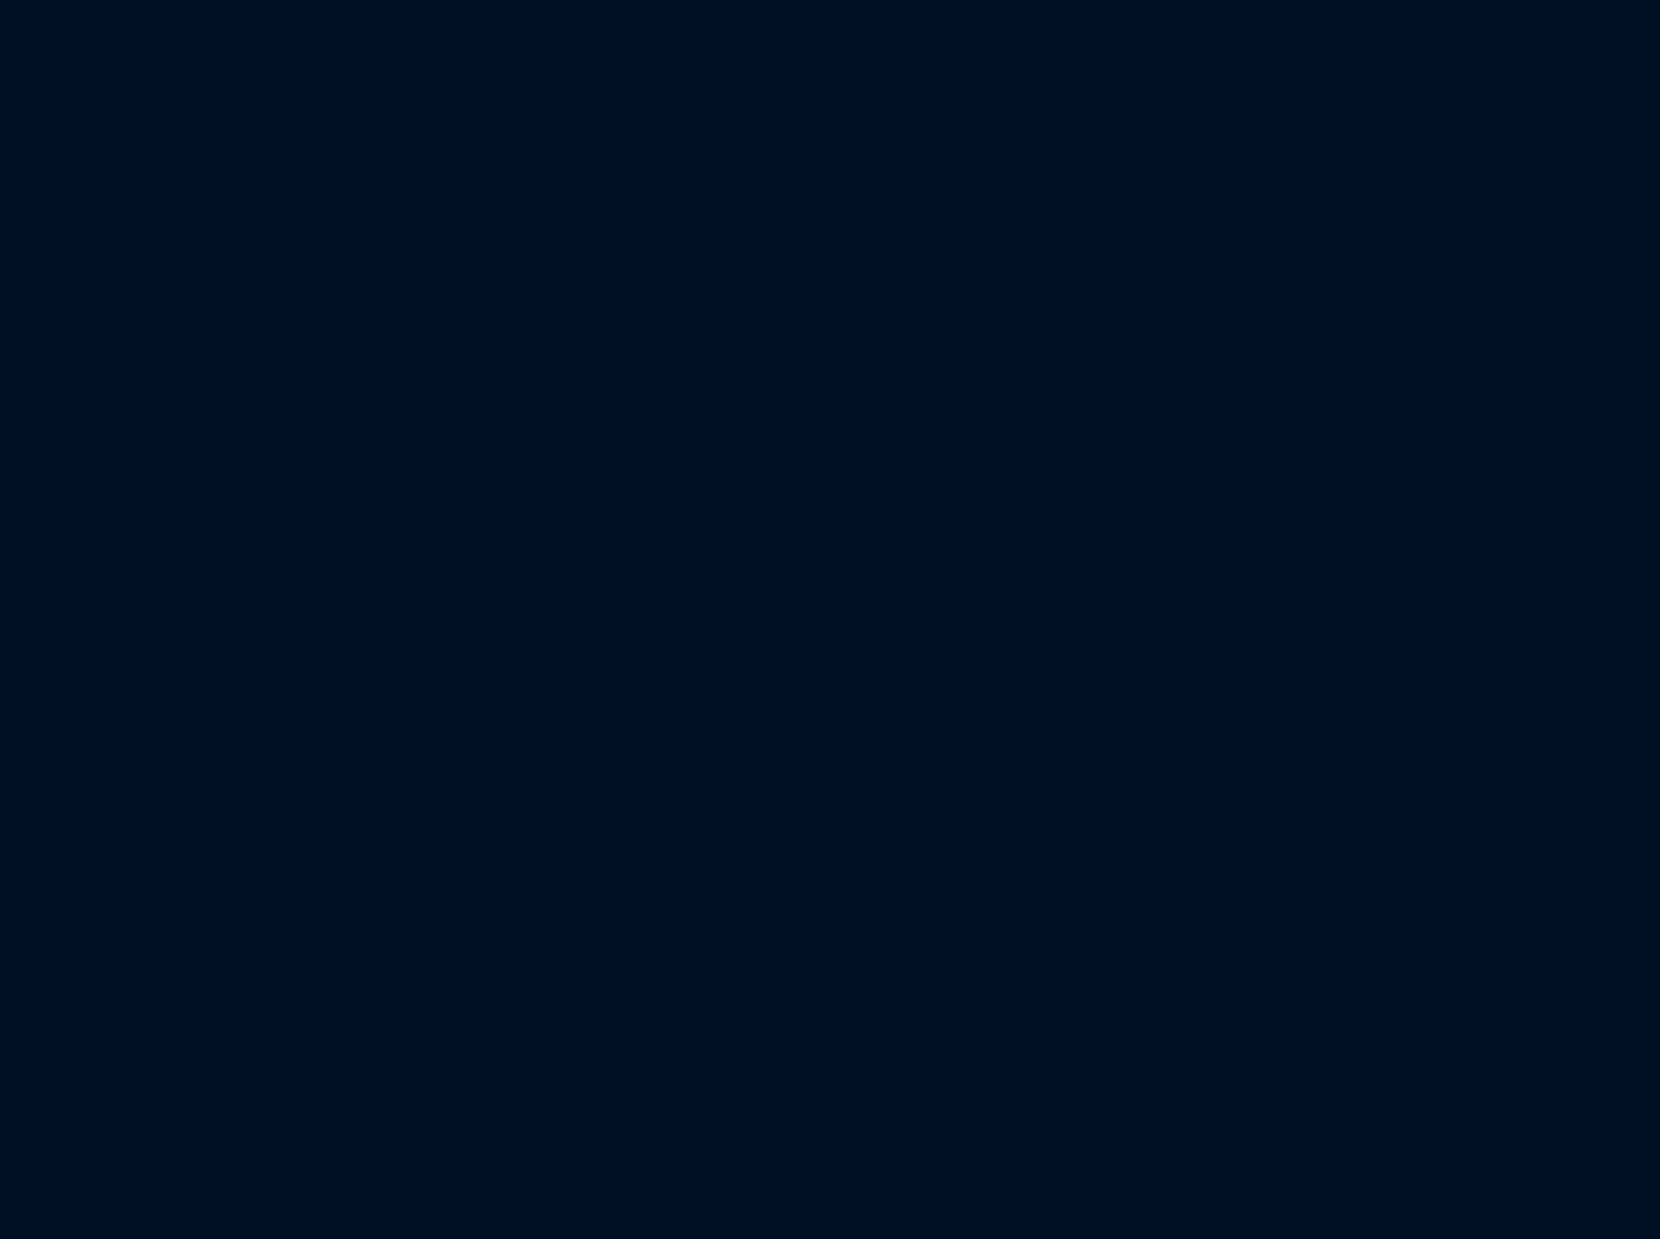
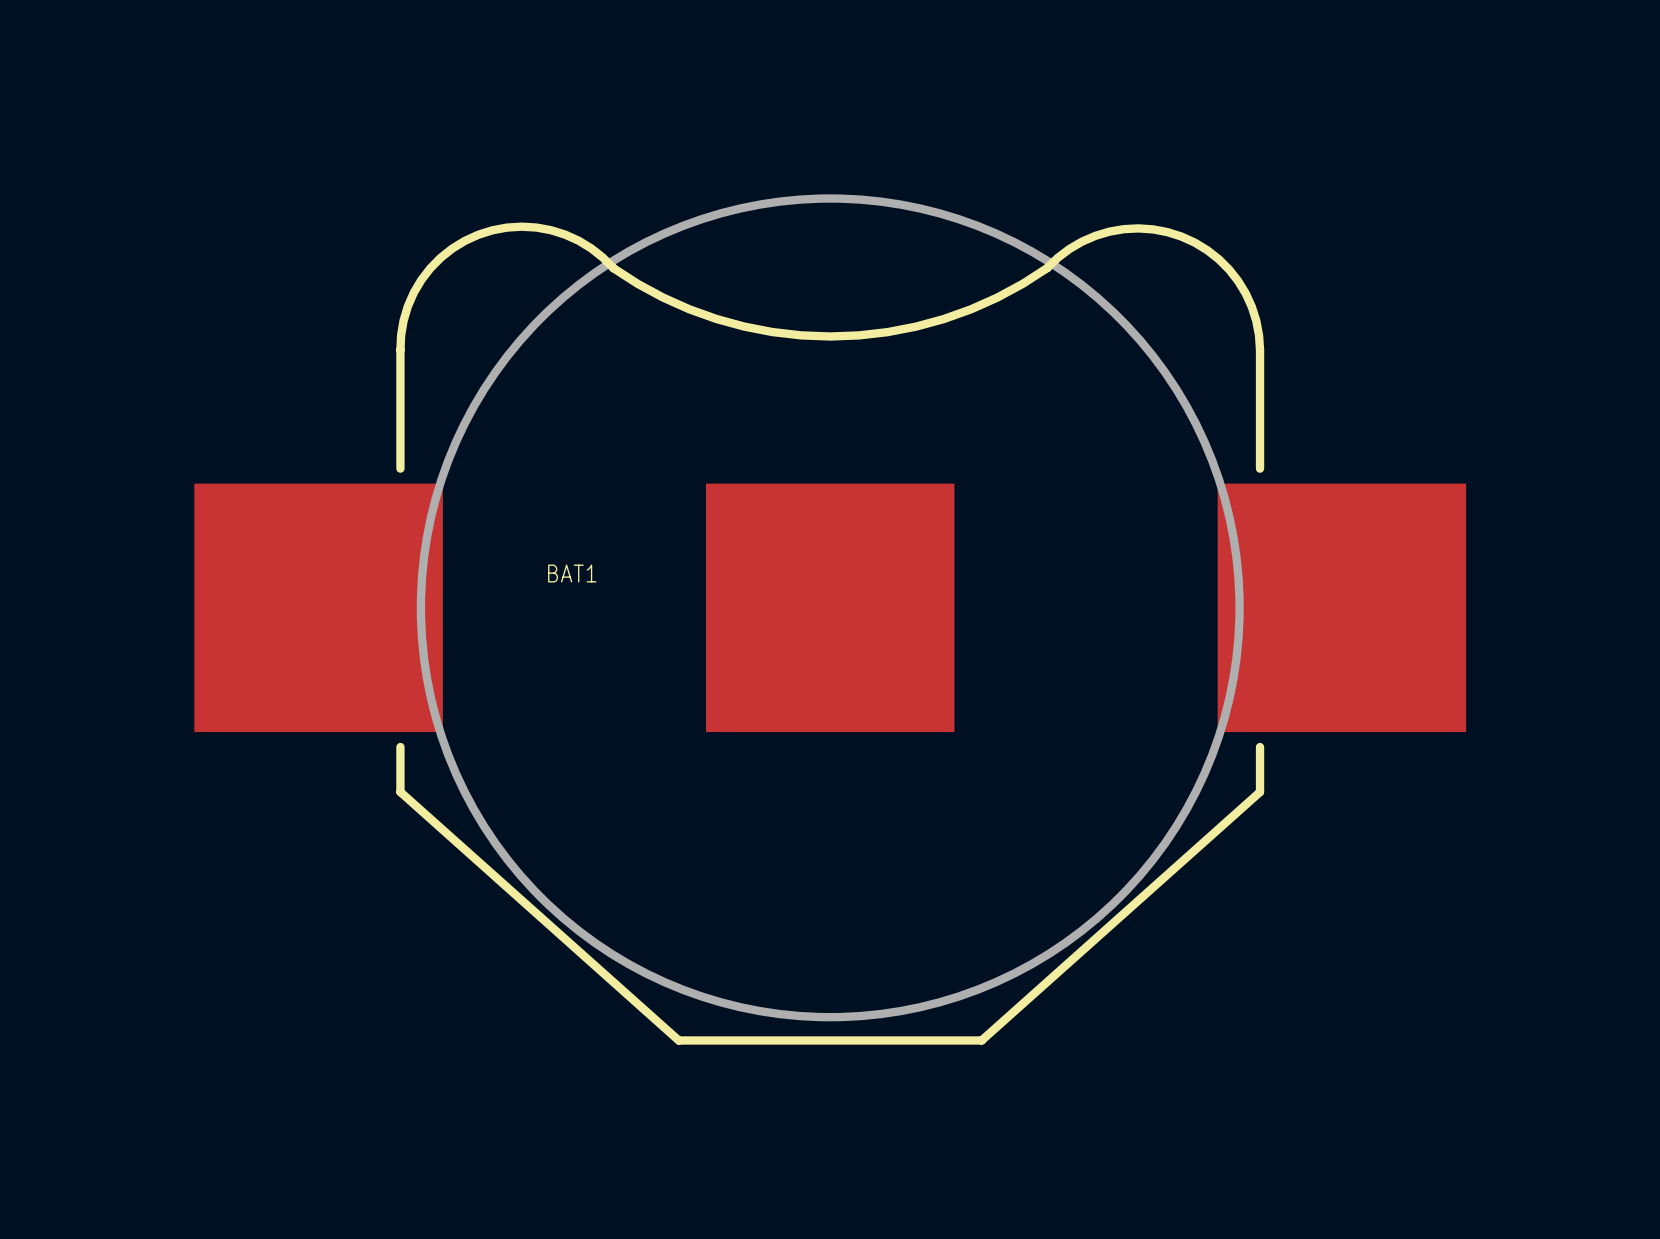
BAT1: none -> (830, 619)

